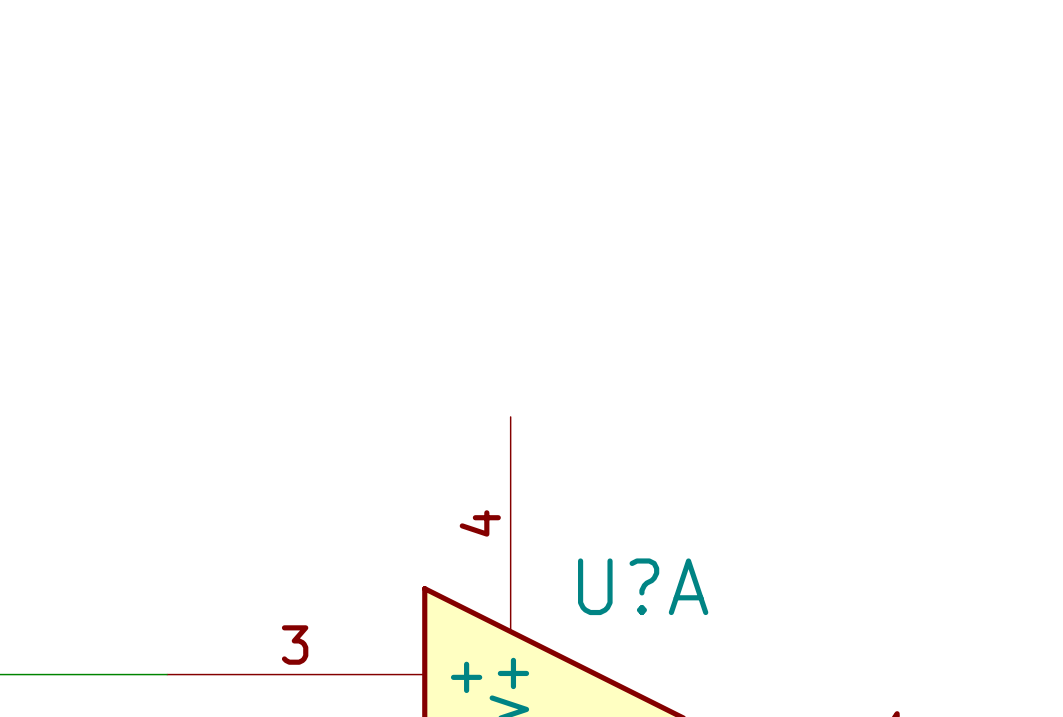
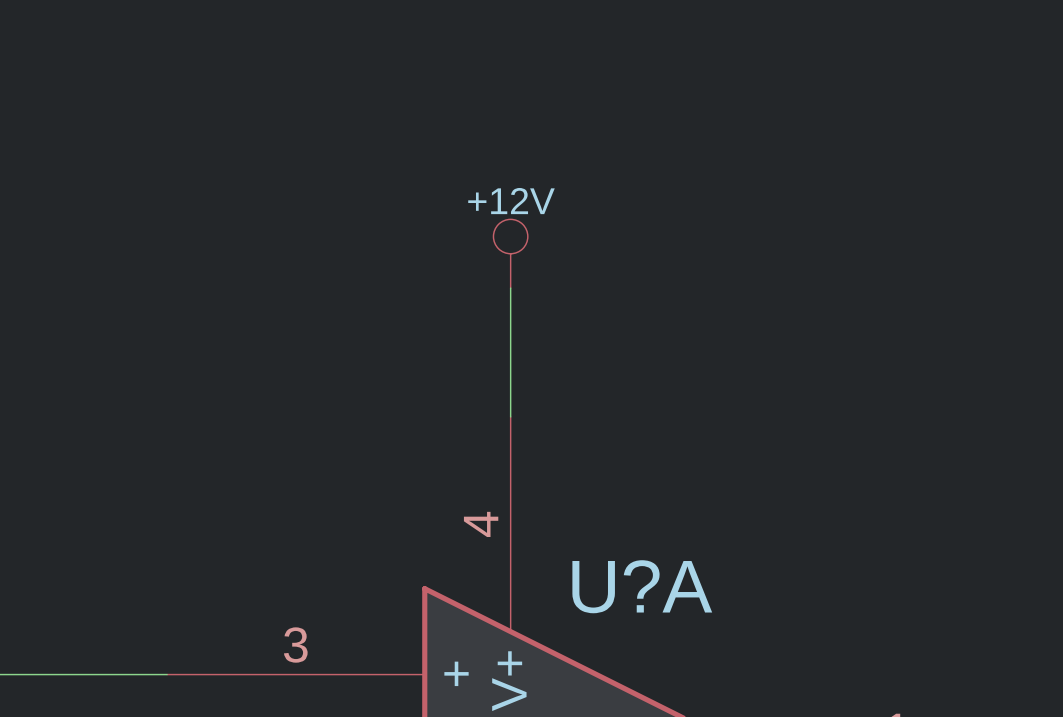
power symbol: none -> +12V (510, 253)
wire: none -> (510, 288) (510, 416)

